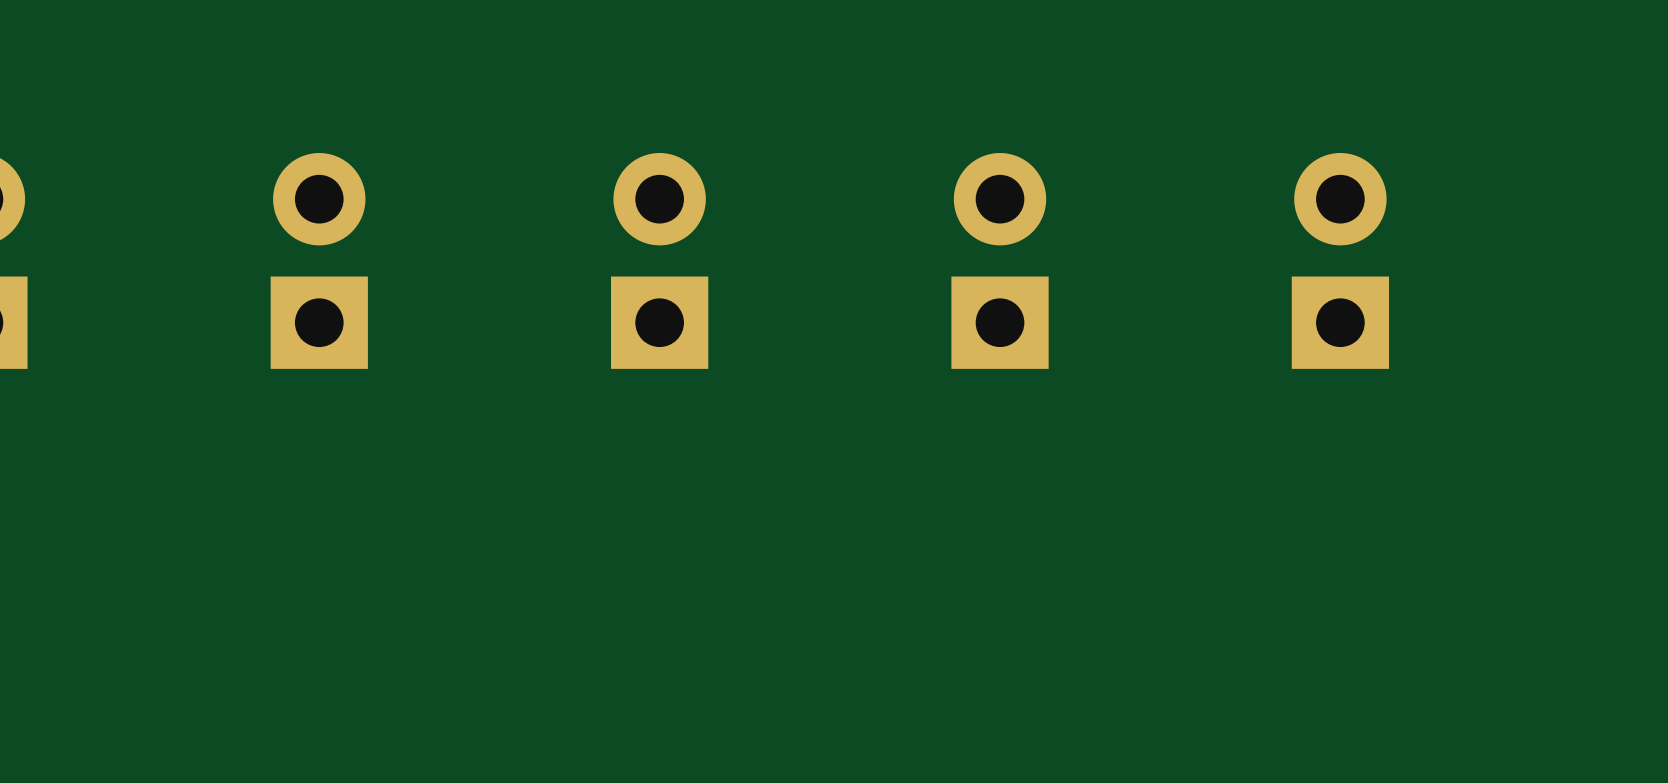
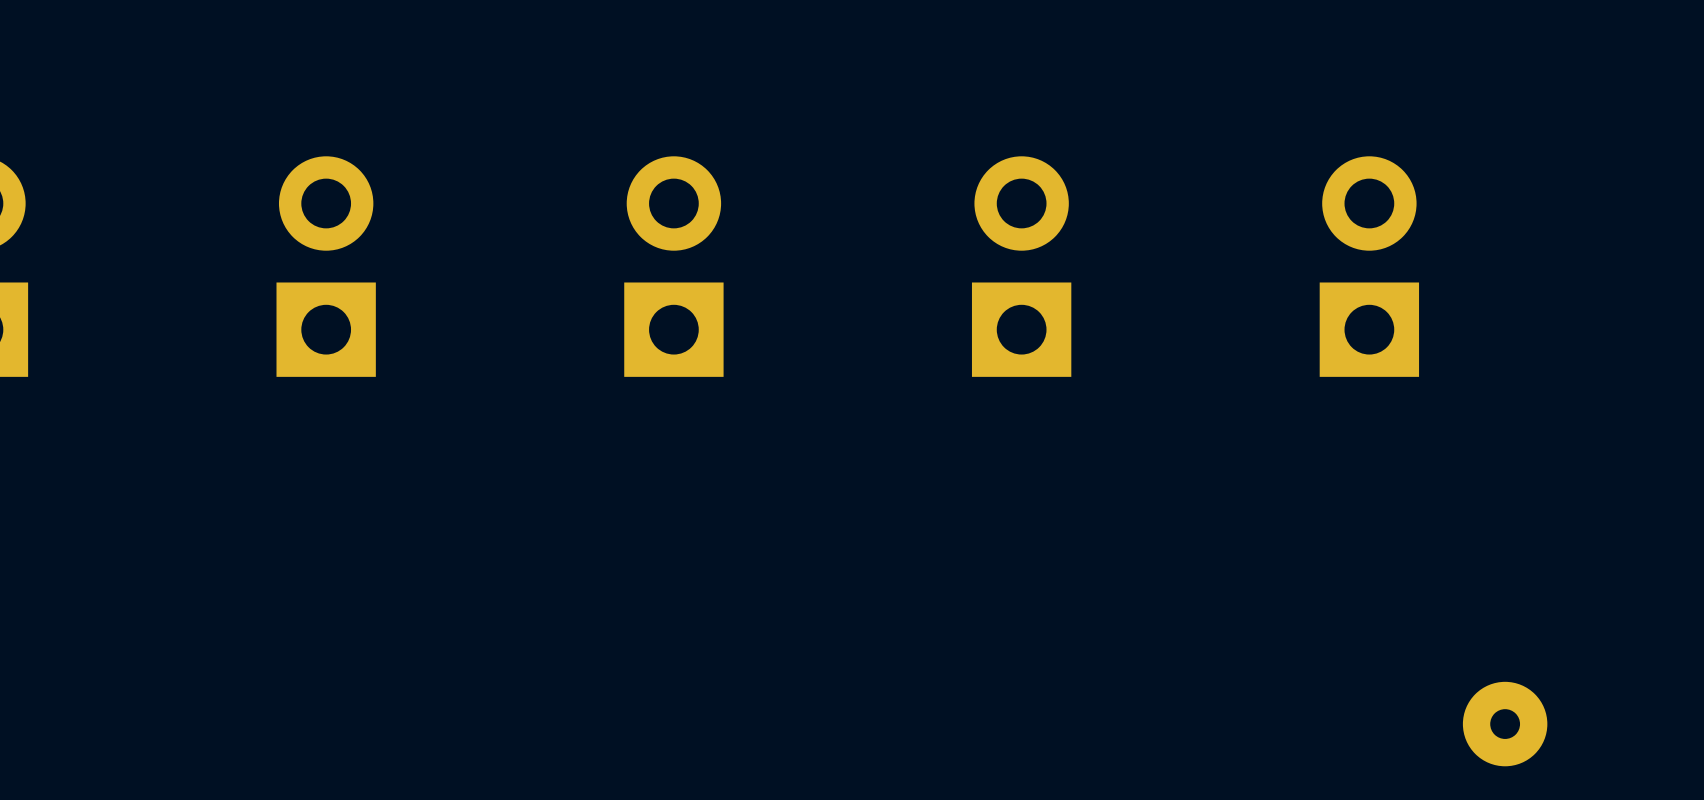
part: none -> (1505, 724)

